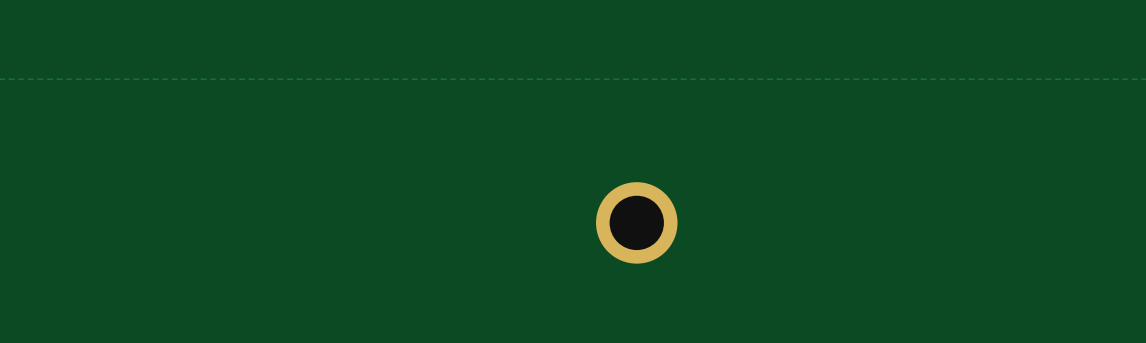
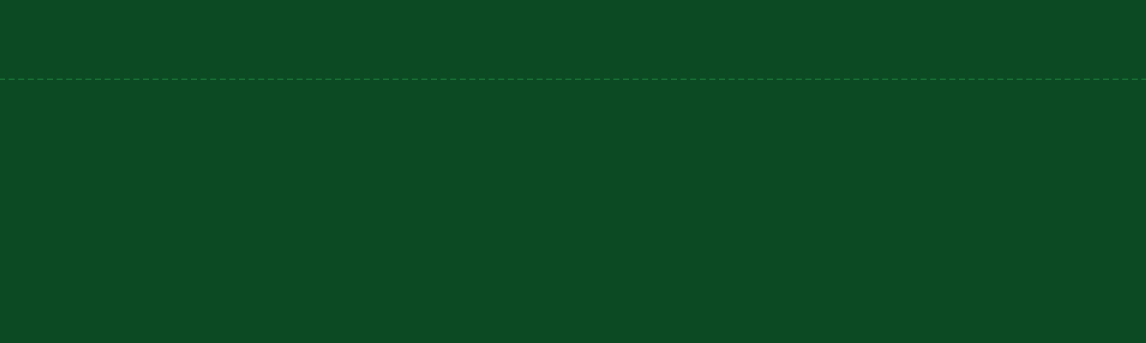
part: (636, 222) -> none

